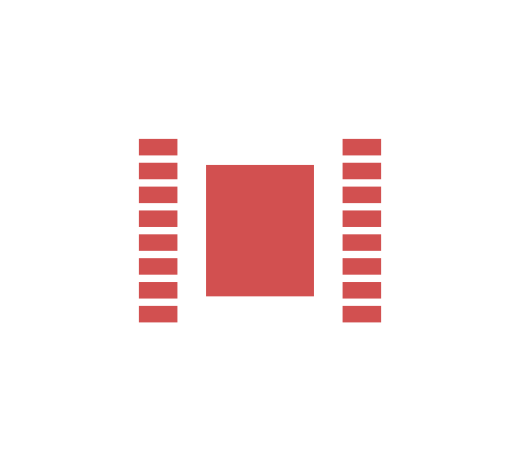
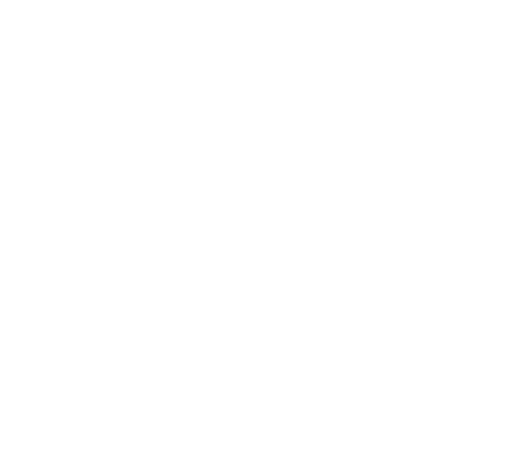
part: (260, 230) -> none

